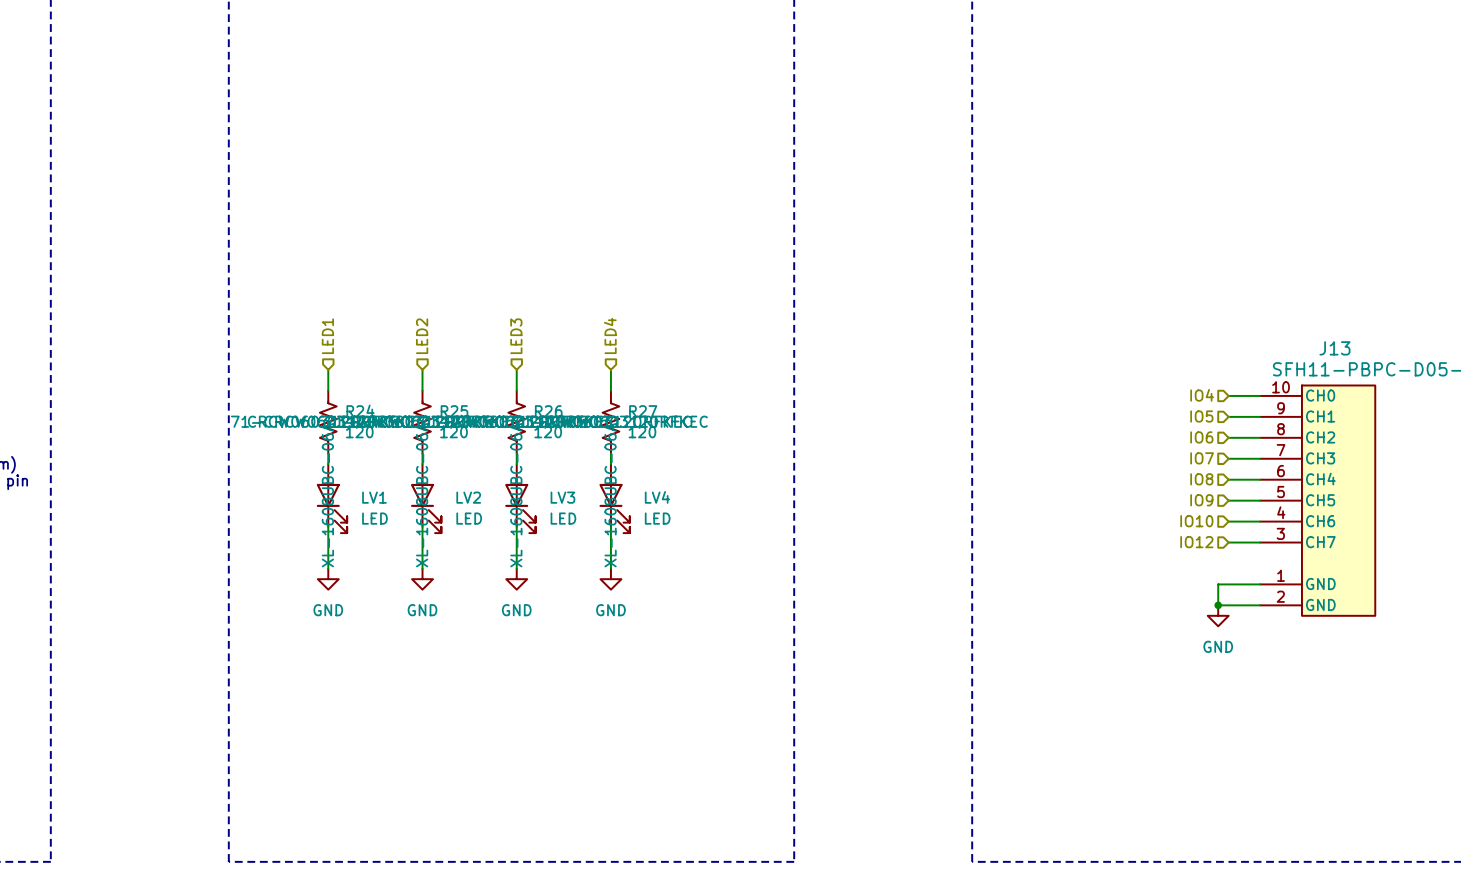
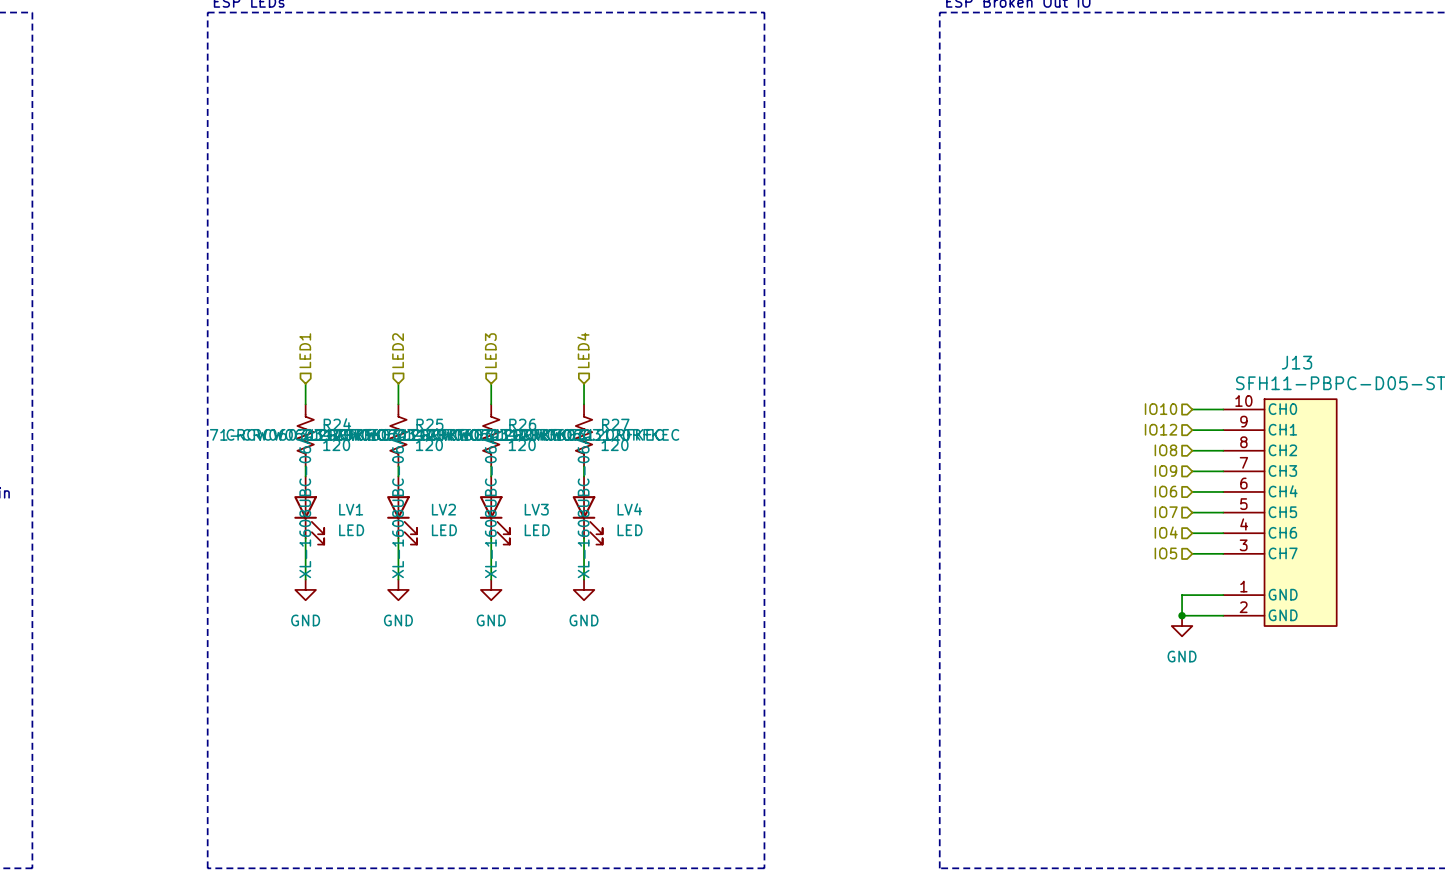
hierarchical label: IO4 (1202, 395) -> IO10 (1161, 409)
hierarchical label: IO5 (1201, 416) -> IO12 (1161, 429)
hierarchical label: IO6 (1201, 437) -> IO8 (1165, 450)
hierarchical label: IO7 (1202, 458) -> IO9 (1165, 470)
hierarchical label: IO8 (1201, 479) -> IO6 (1165, 491)
hierarchical label: IO9 (1201, 500) -> IO7 (1166, 512)
hierarchical label: IO10 (1196, 521) -> IO4 (1166, 532)
hierarchical label: IO12 (1196, 542) -> IO5 (1165, 553)

